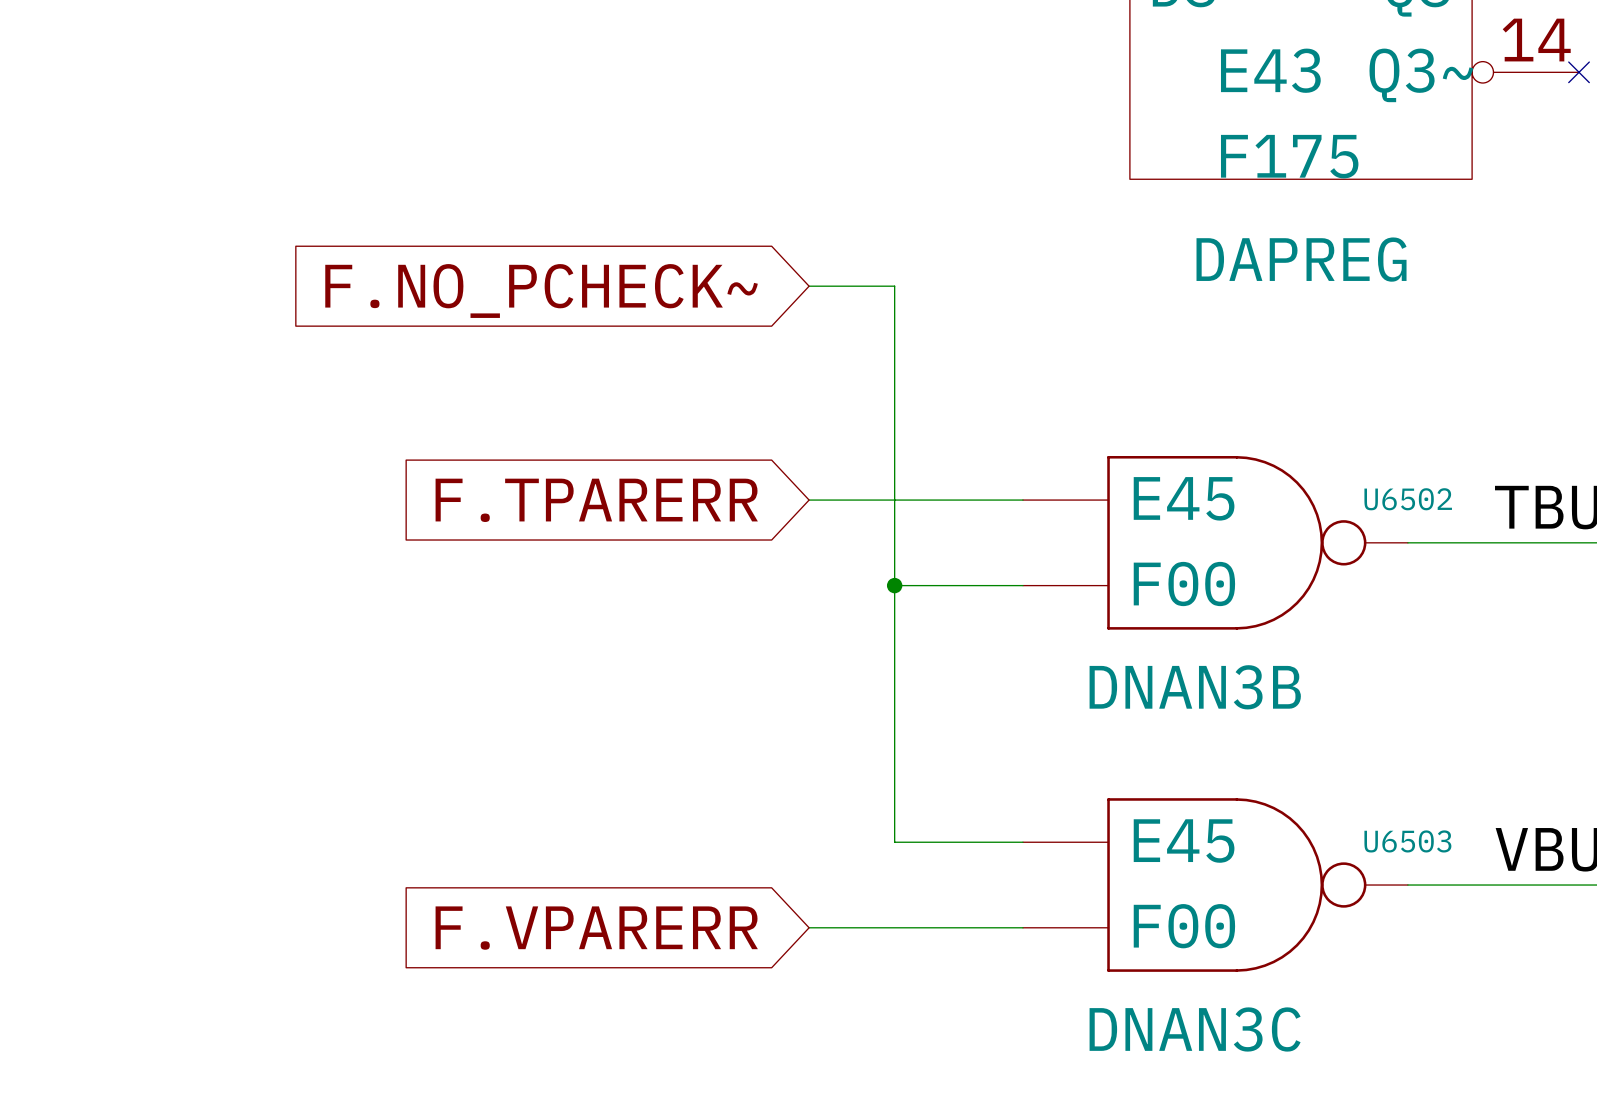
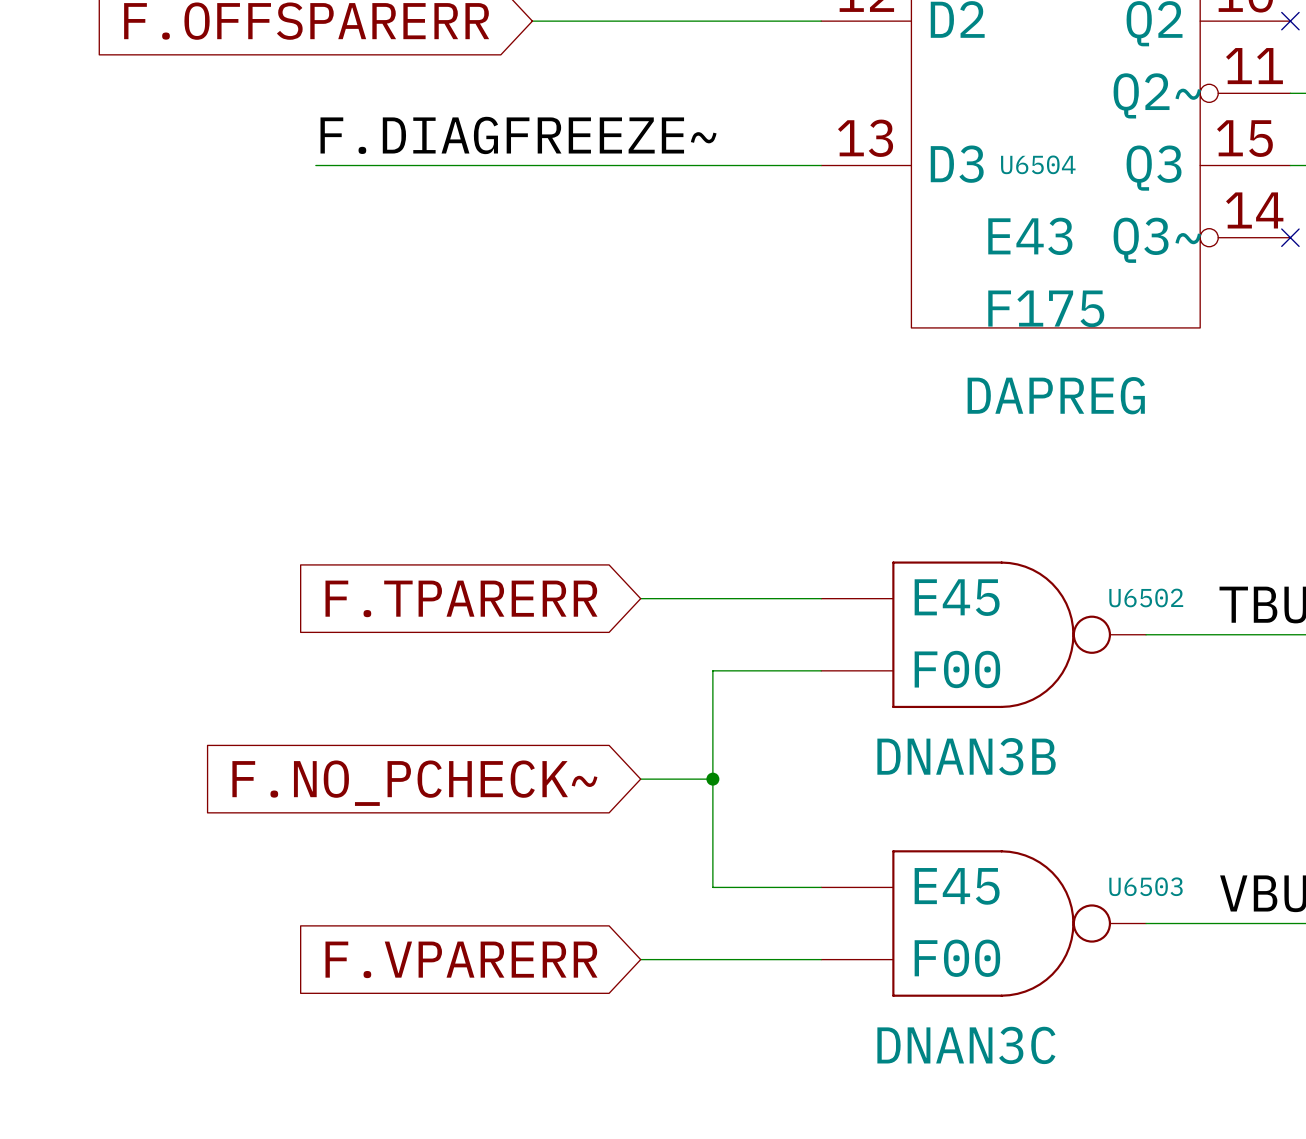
wire: (809, 286) (894, 286) (894, 585) -> none
global label: F.NO_PCHECK~ (541, 291) -> none
junction: (894, 585) -> none
wire: none -> (640, 779) (712, 779)
junction: none -> (712, 779)
global label: none -> F.NO_PCHECK~ (414, 783)

